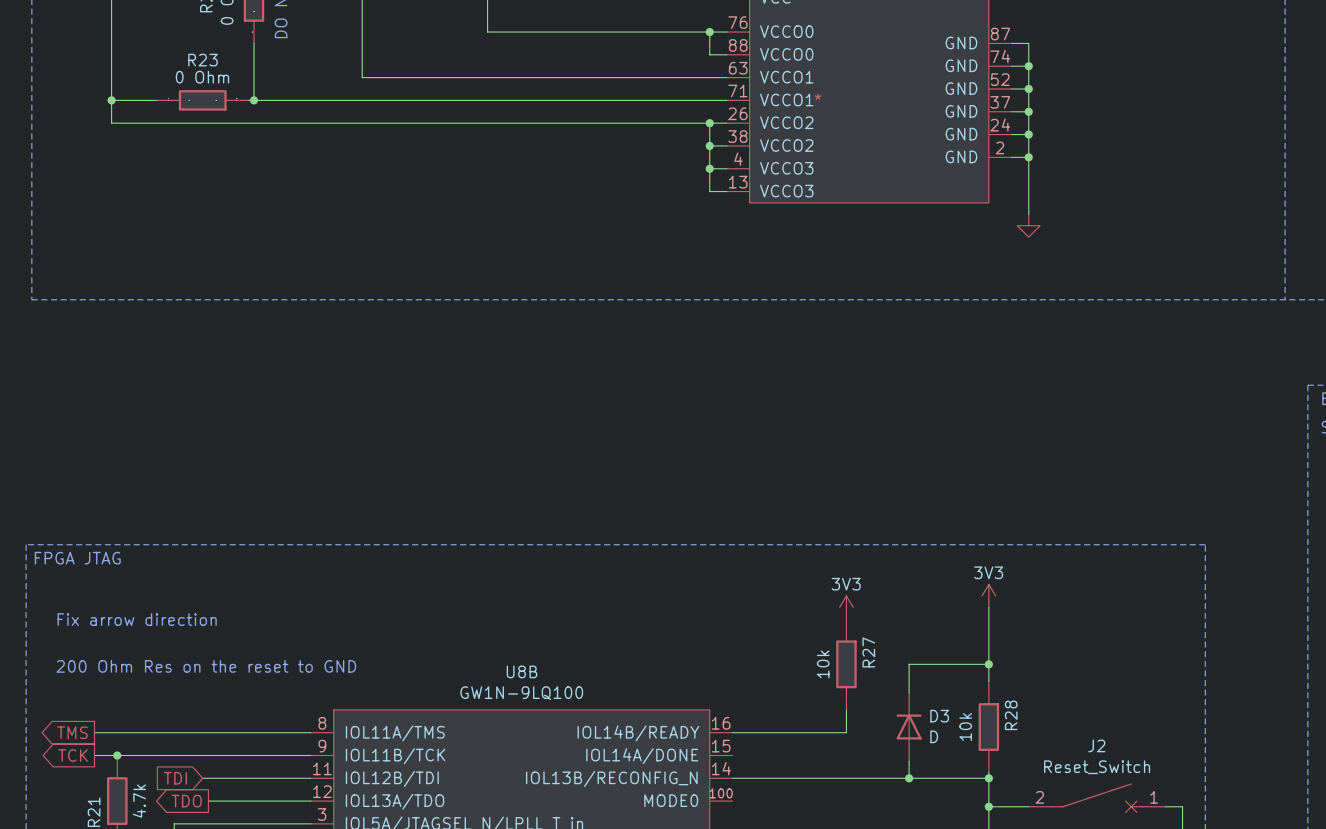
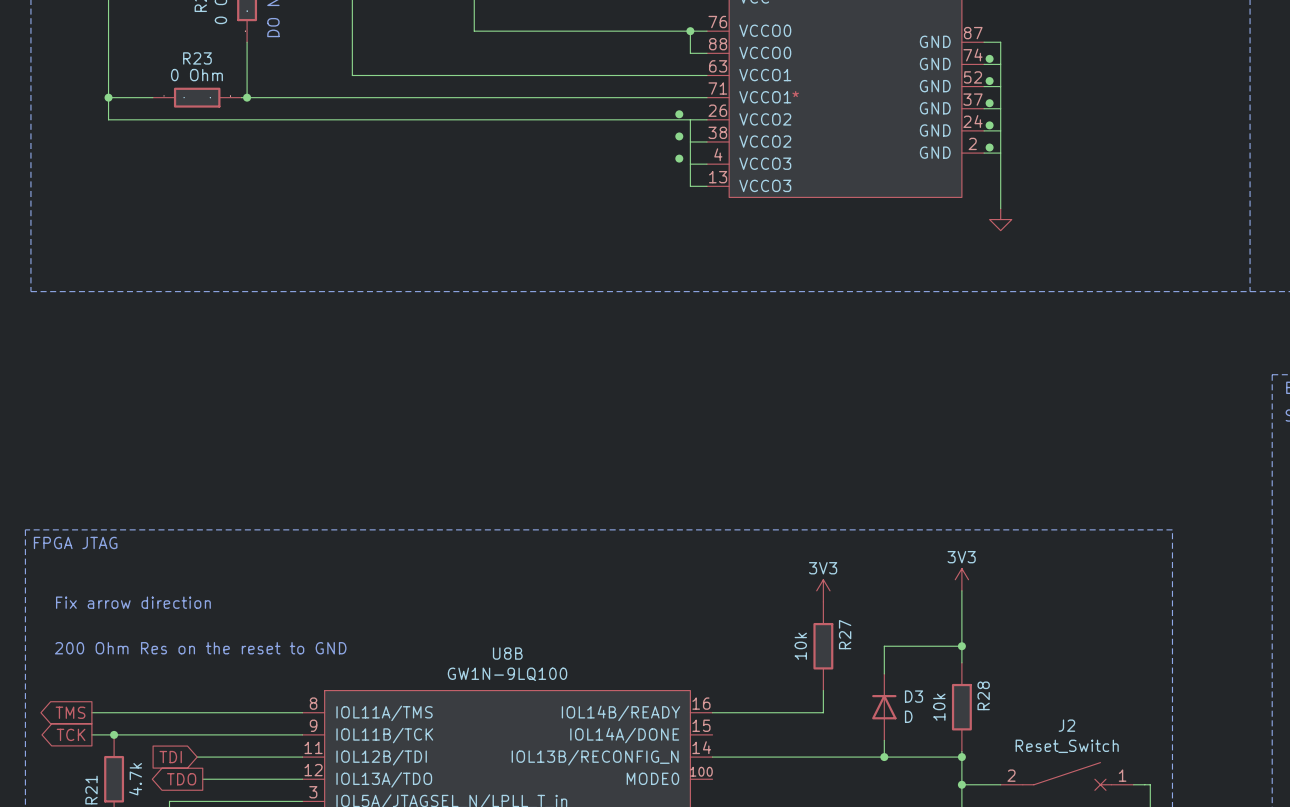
junction: none -> (989, 58)
junction: (1028, 66) -> none
junction: none -> (989, 81)
junction: (1028, 89) -> none
junction: none -> (989, 103)
junction: (1028, 111) -> none
junction: none -> (679, 114)
junction: (709, 123) -> none
junction: none -> (989, 125)
junction: (1028, 134) -> none
junction: none -> (679, 136)
junction: (709, 145) -> none
junction: none -> (989, 147)
junction: (1028, 157) -> none
junction: none -> (679, 158)
junction: (709, 168) -> none

